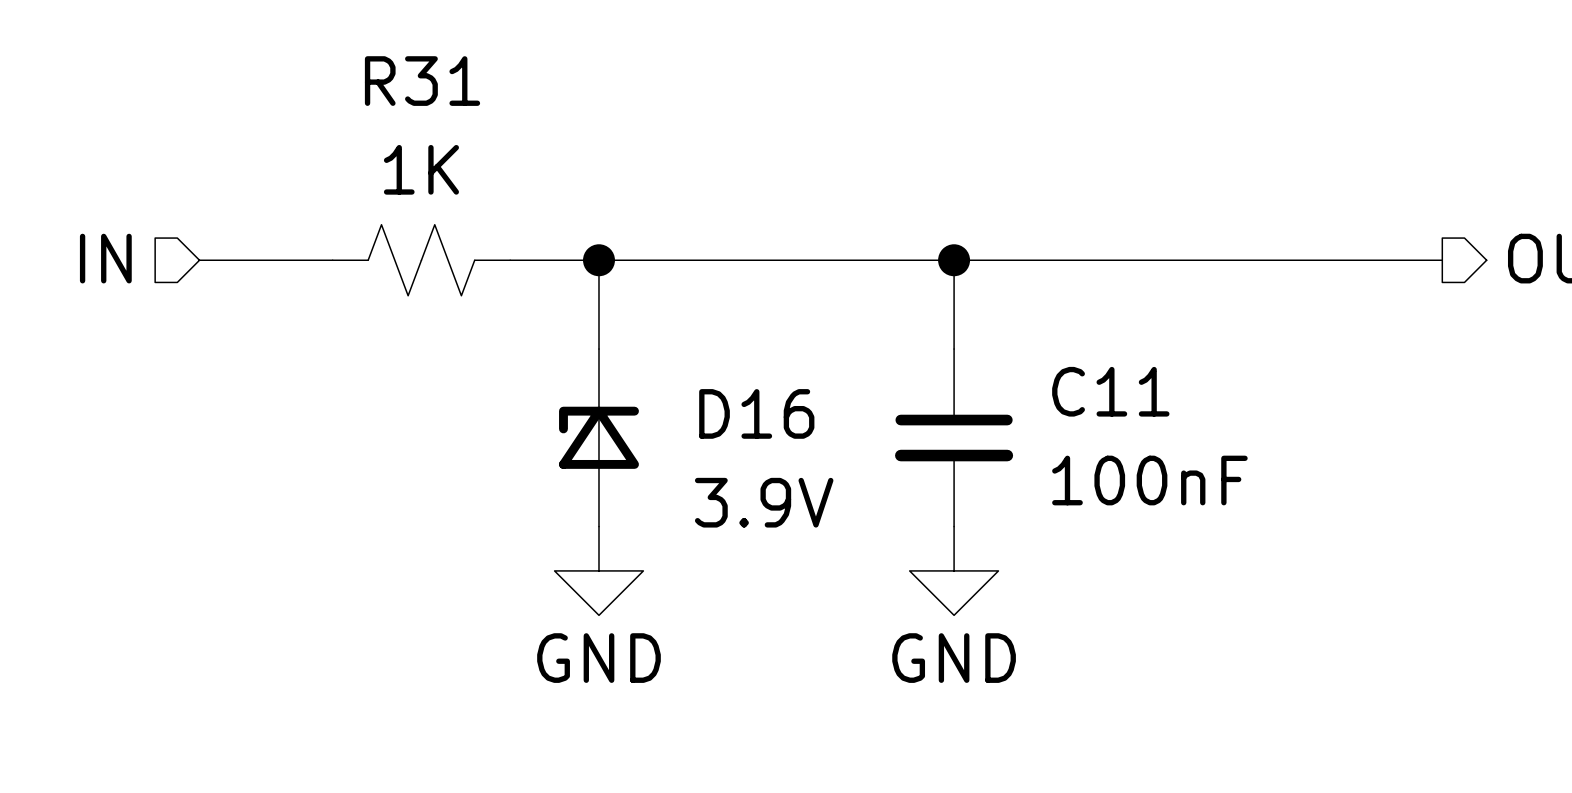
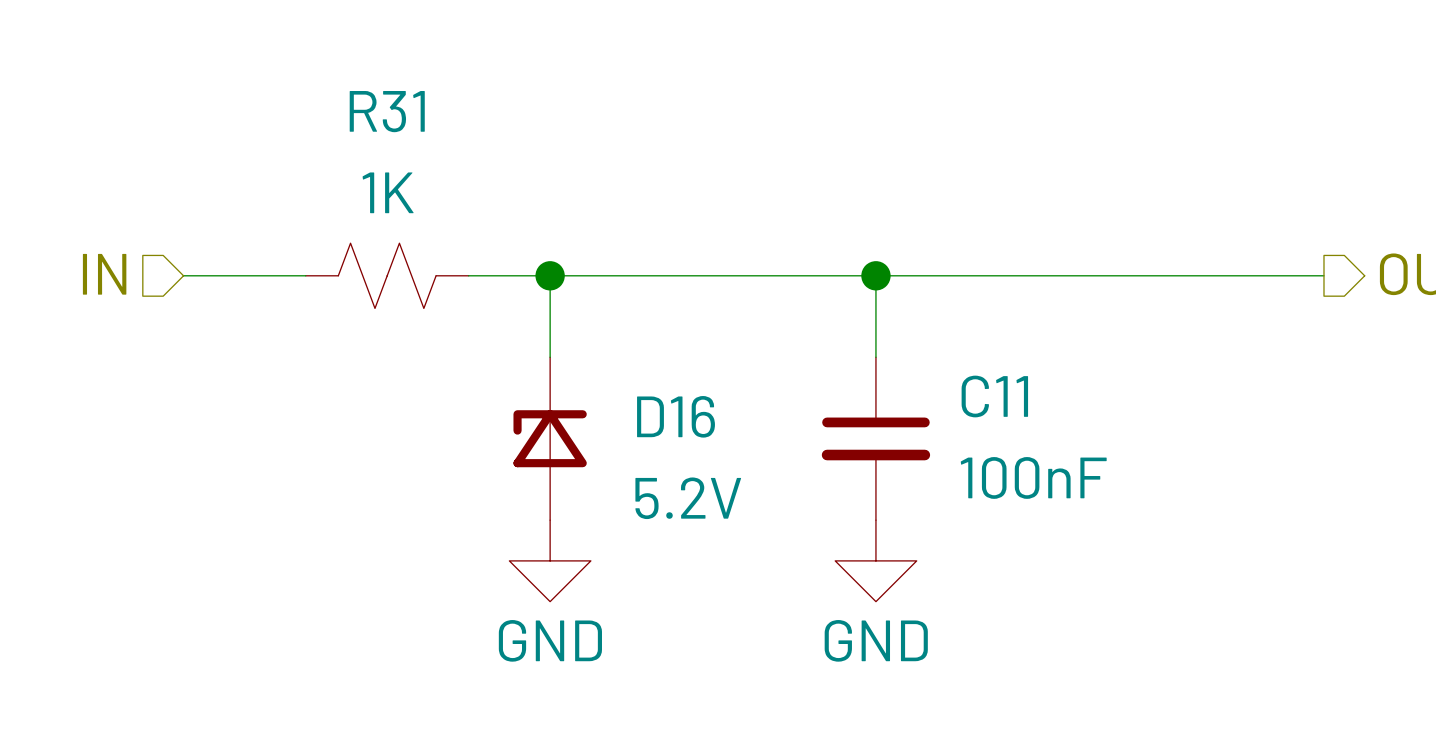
D16 value: 3.9V (764, 502) -> 5.2V (688, 498)

